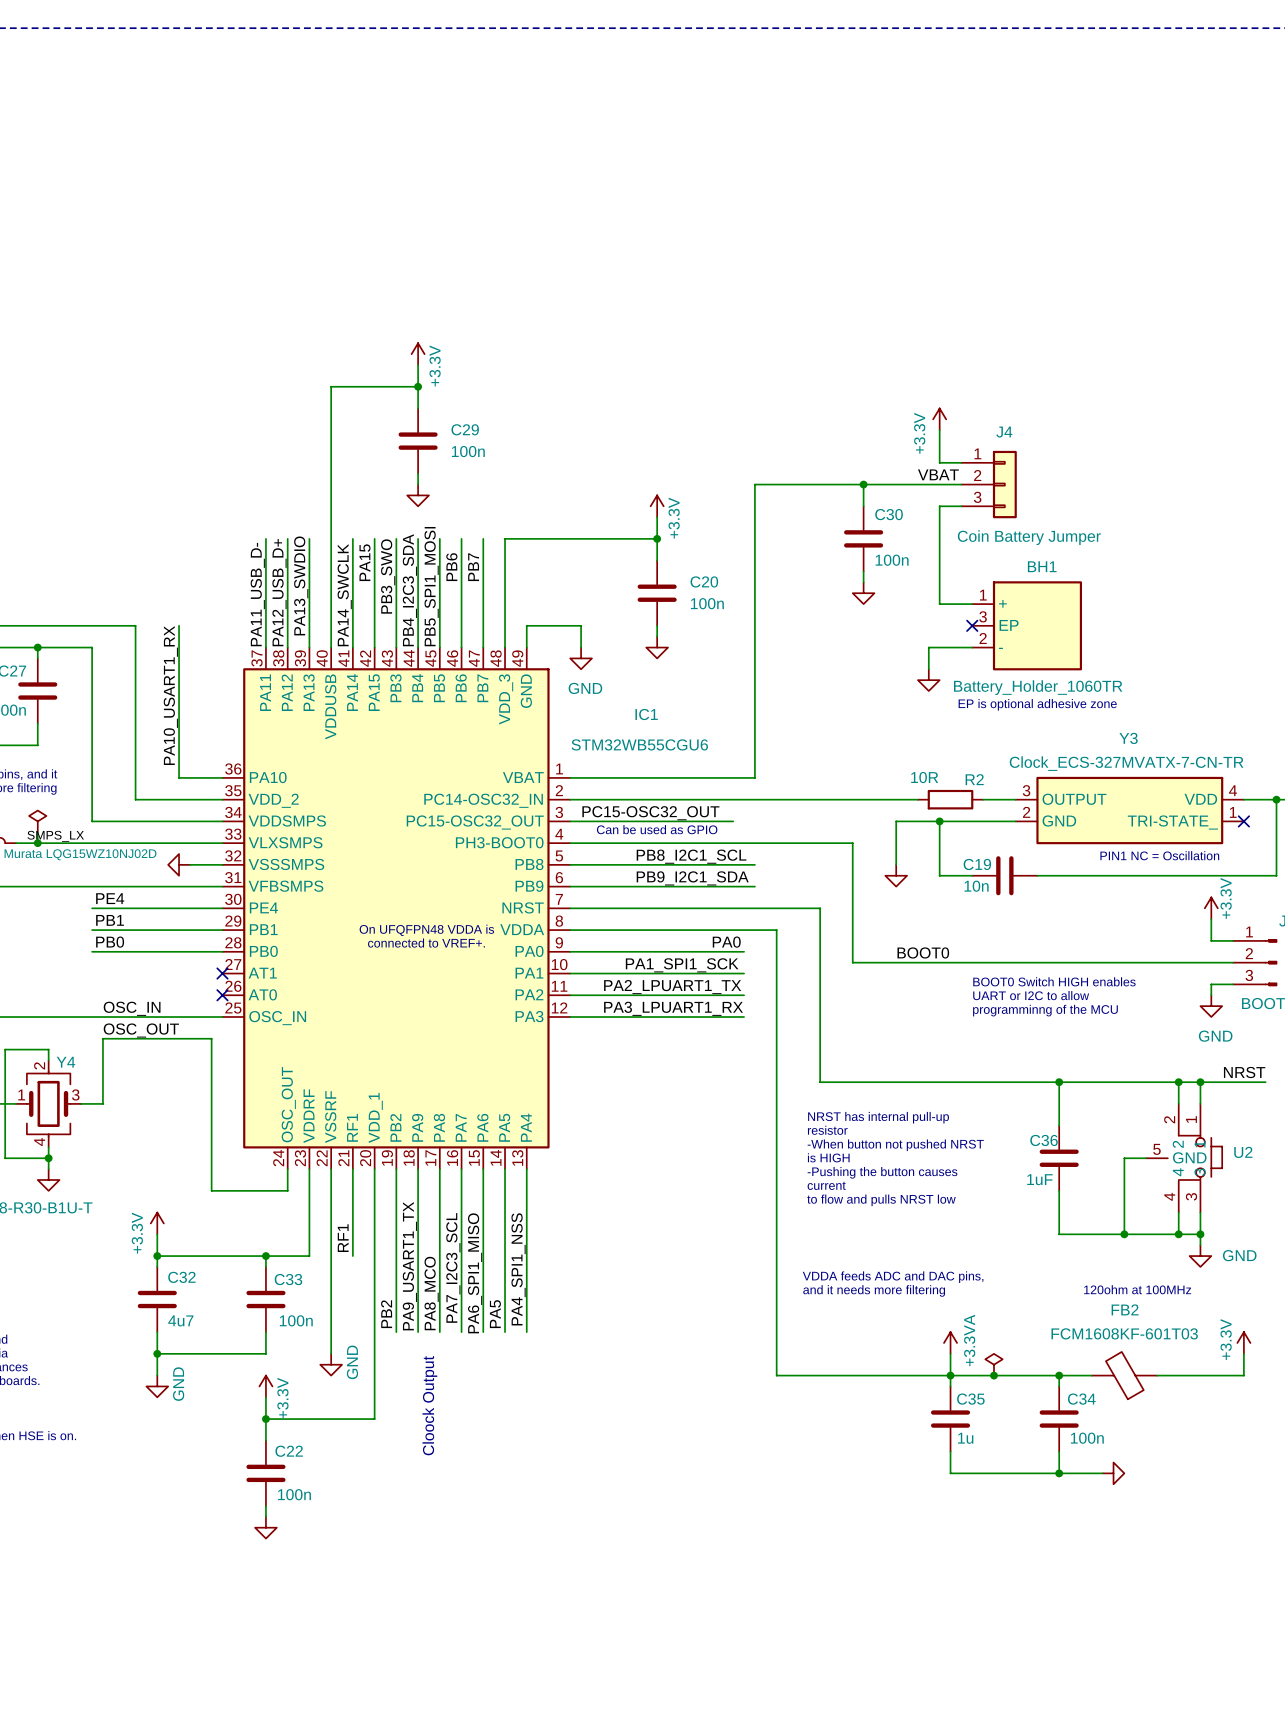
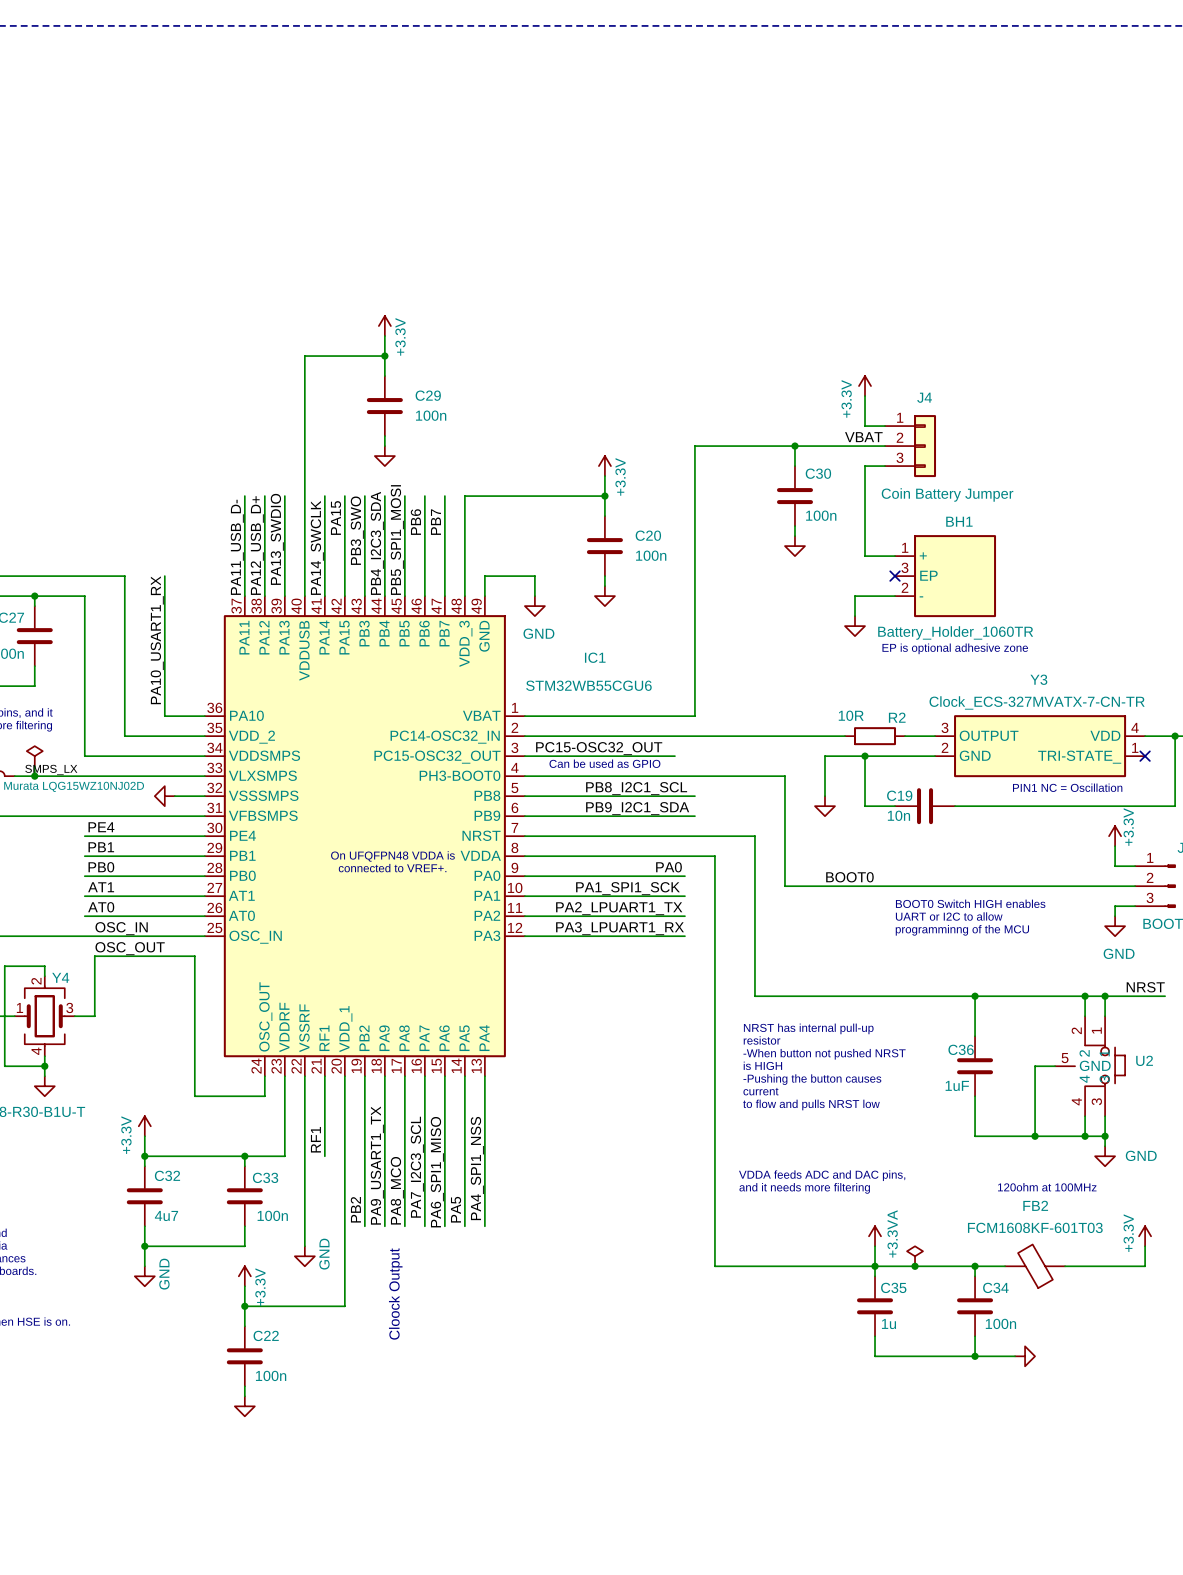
label: none -> AT1 (101, 887)
wire: none -> (84, 896) (204, 896)
no-connect mark: (222, 973) -> none
label: none -> AT0 (101, 907)
wire: none -> (84, 916) (204, 916)
no-connect mark: (222, 995) -> none

